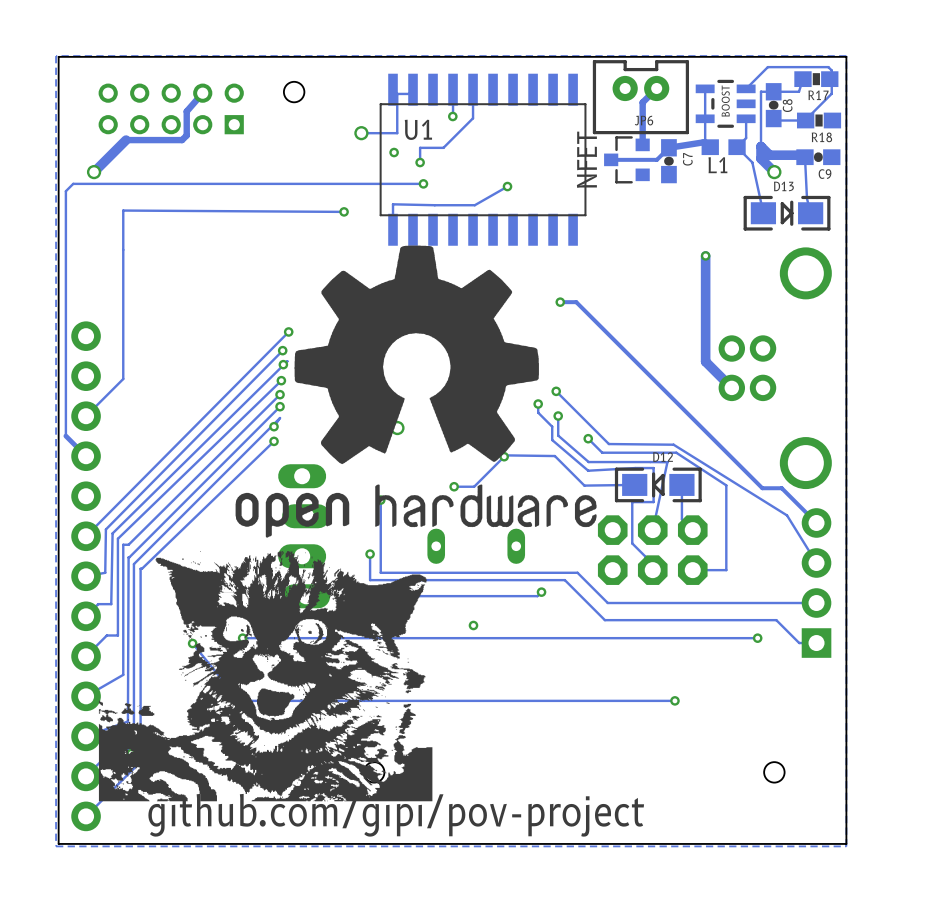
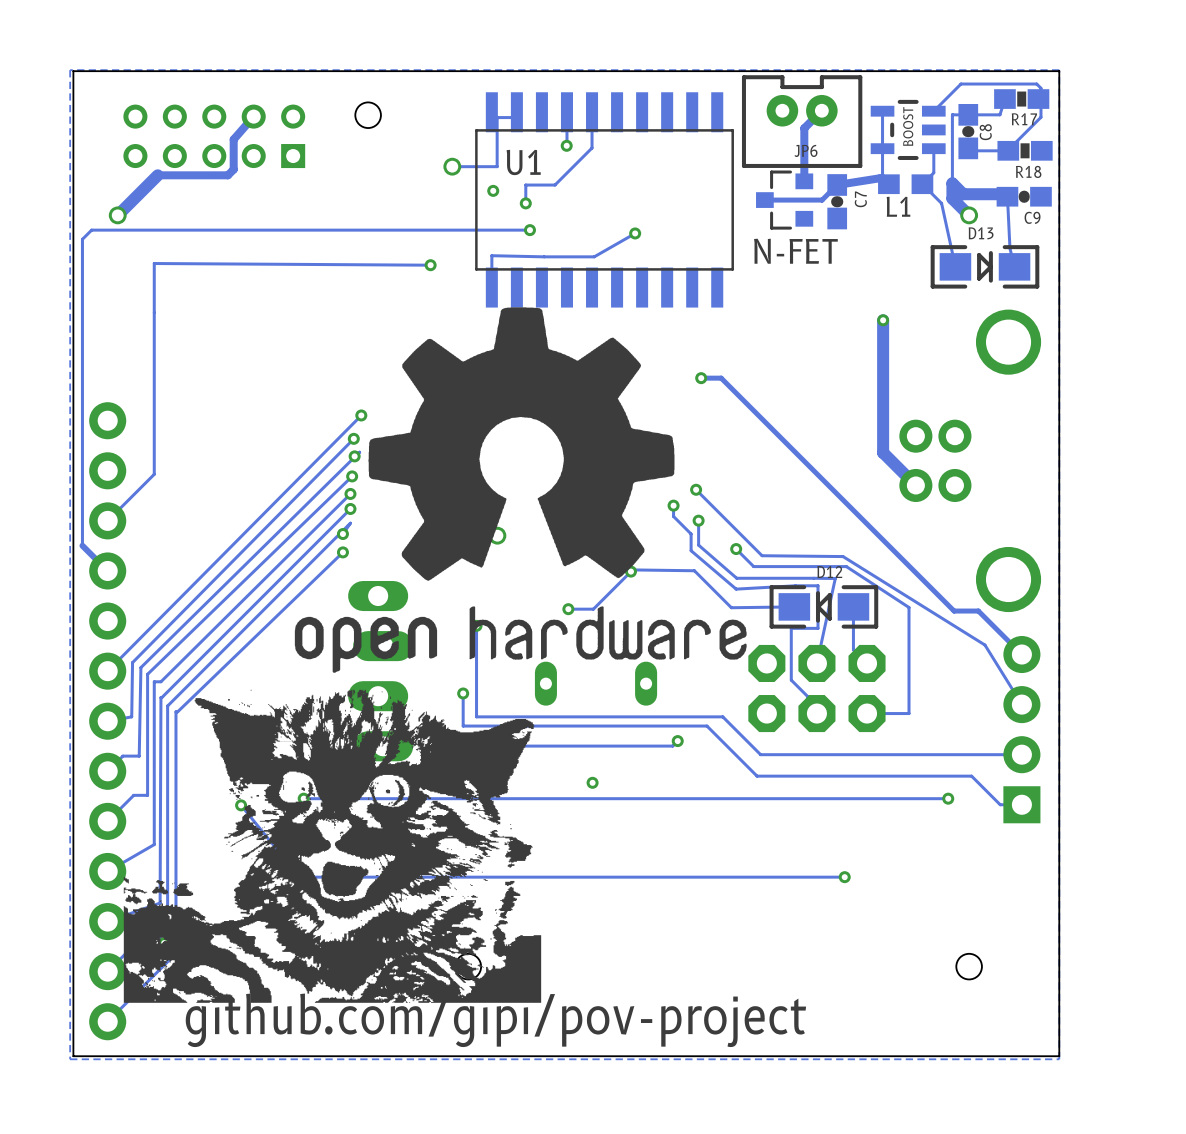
NFET name: NFET (586, 159) -> N-FET (795, 251)

